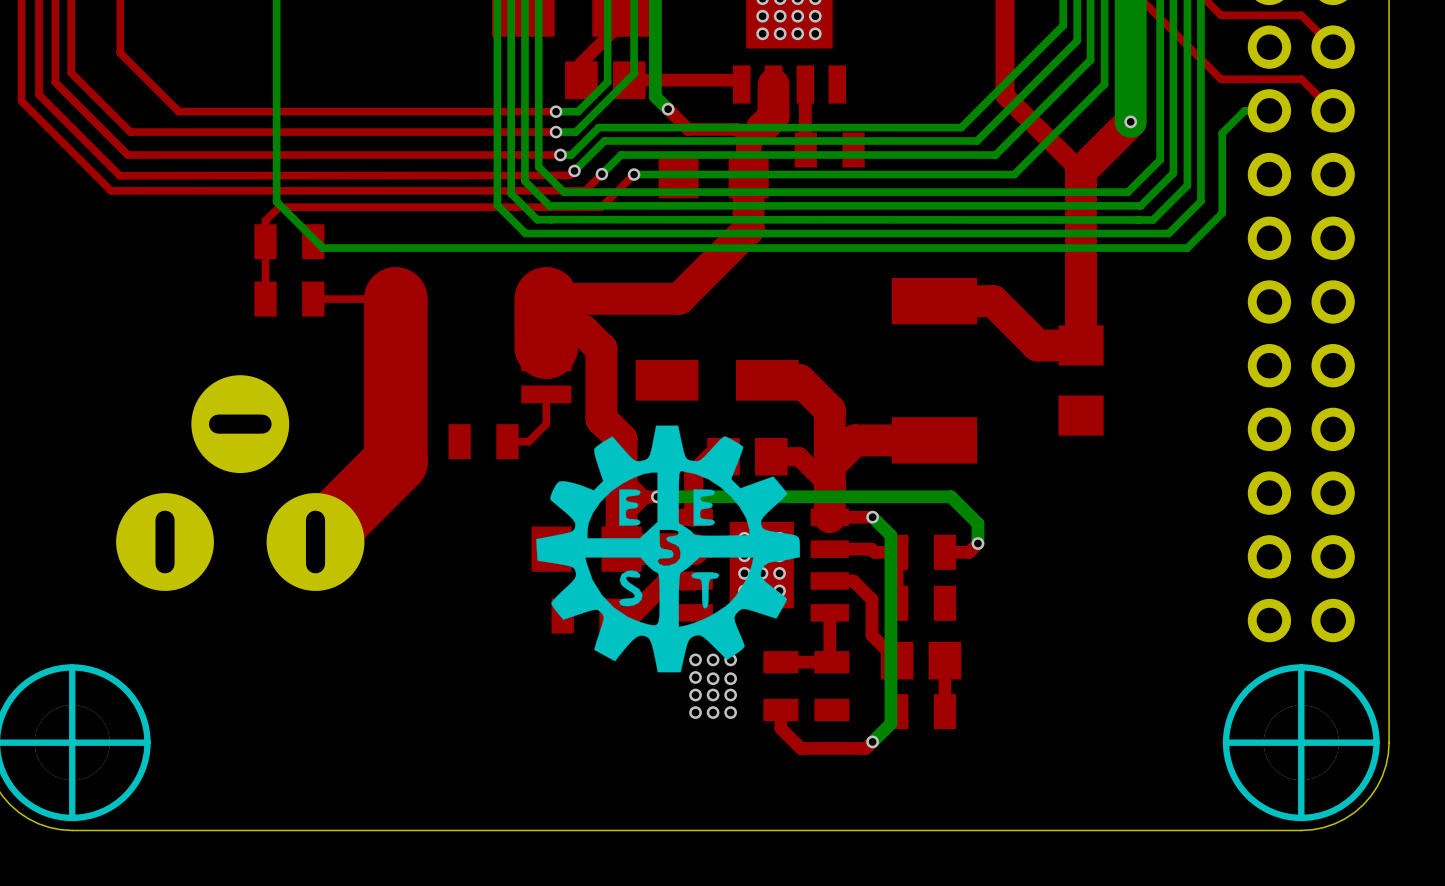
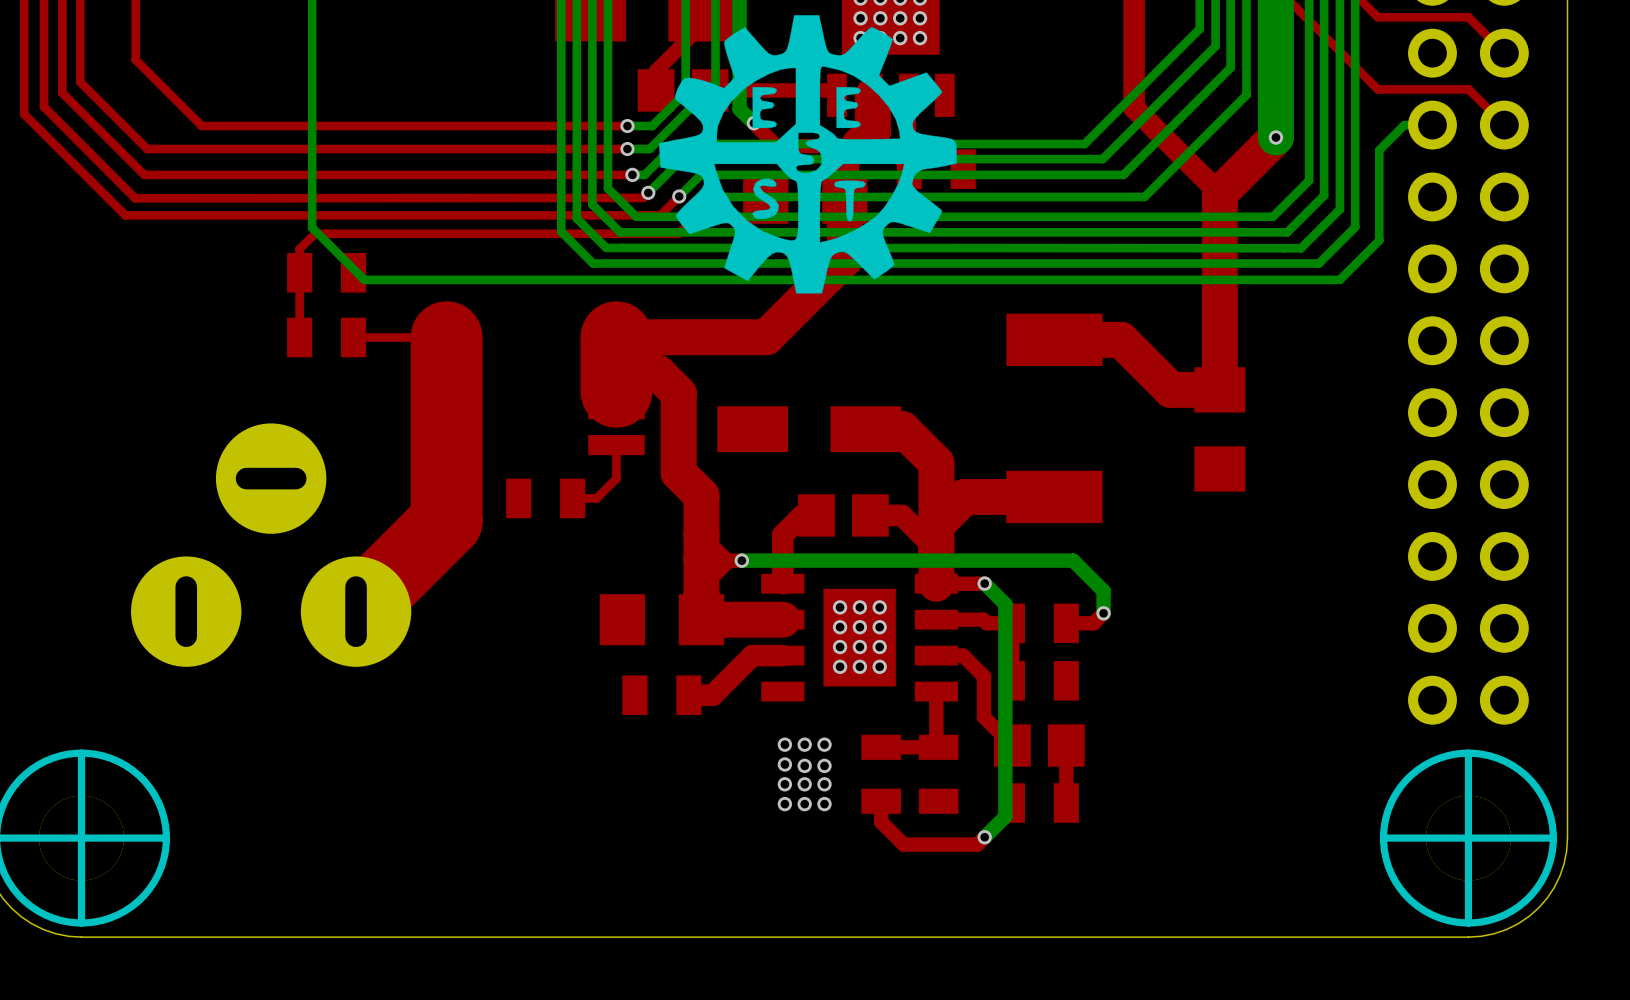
drawing position: (668, 548) -> (807, 154)

